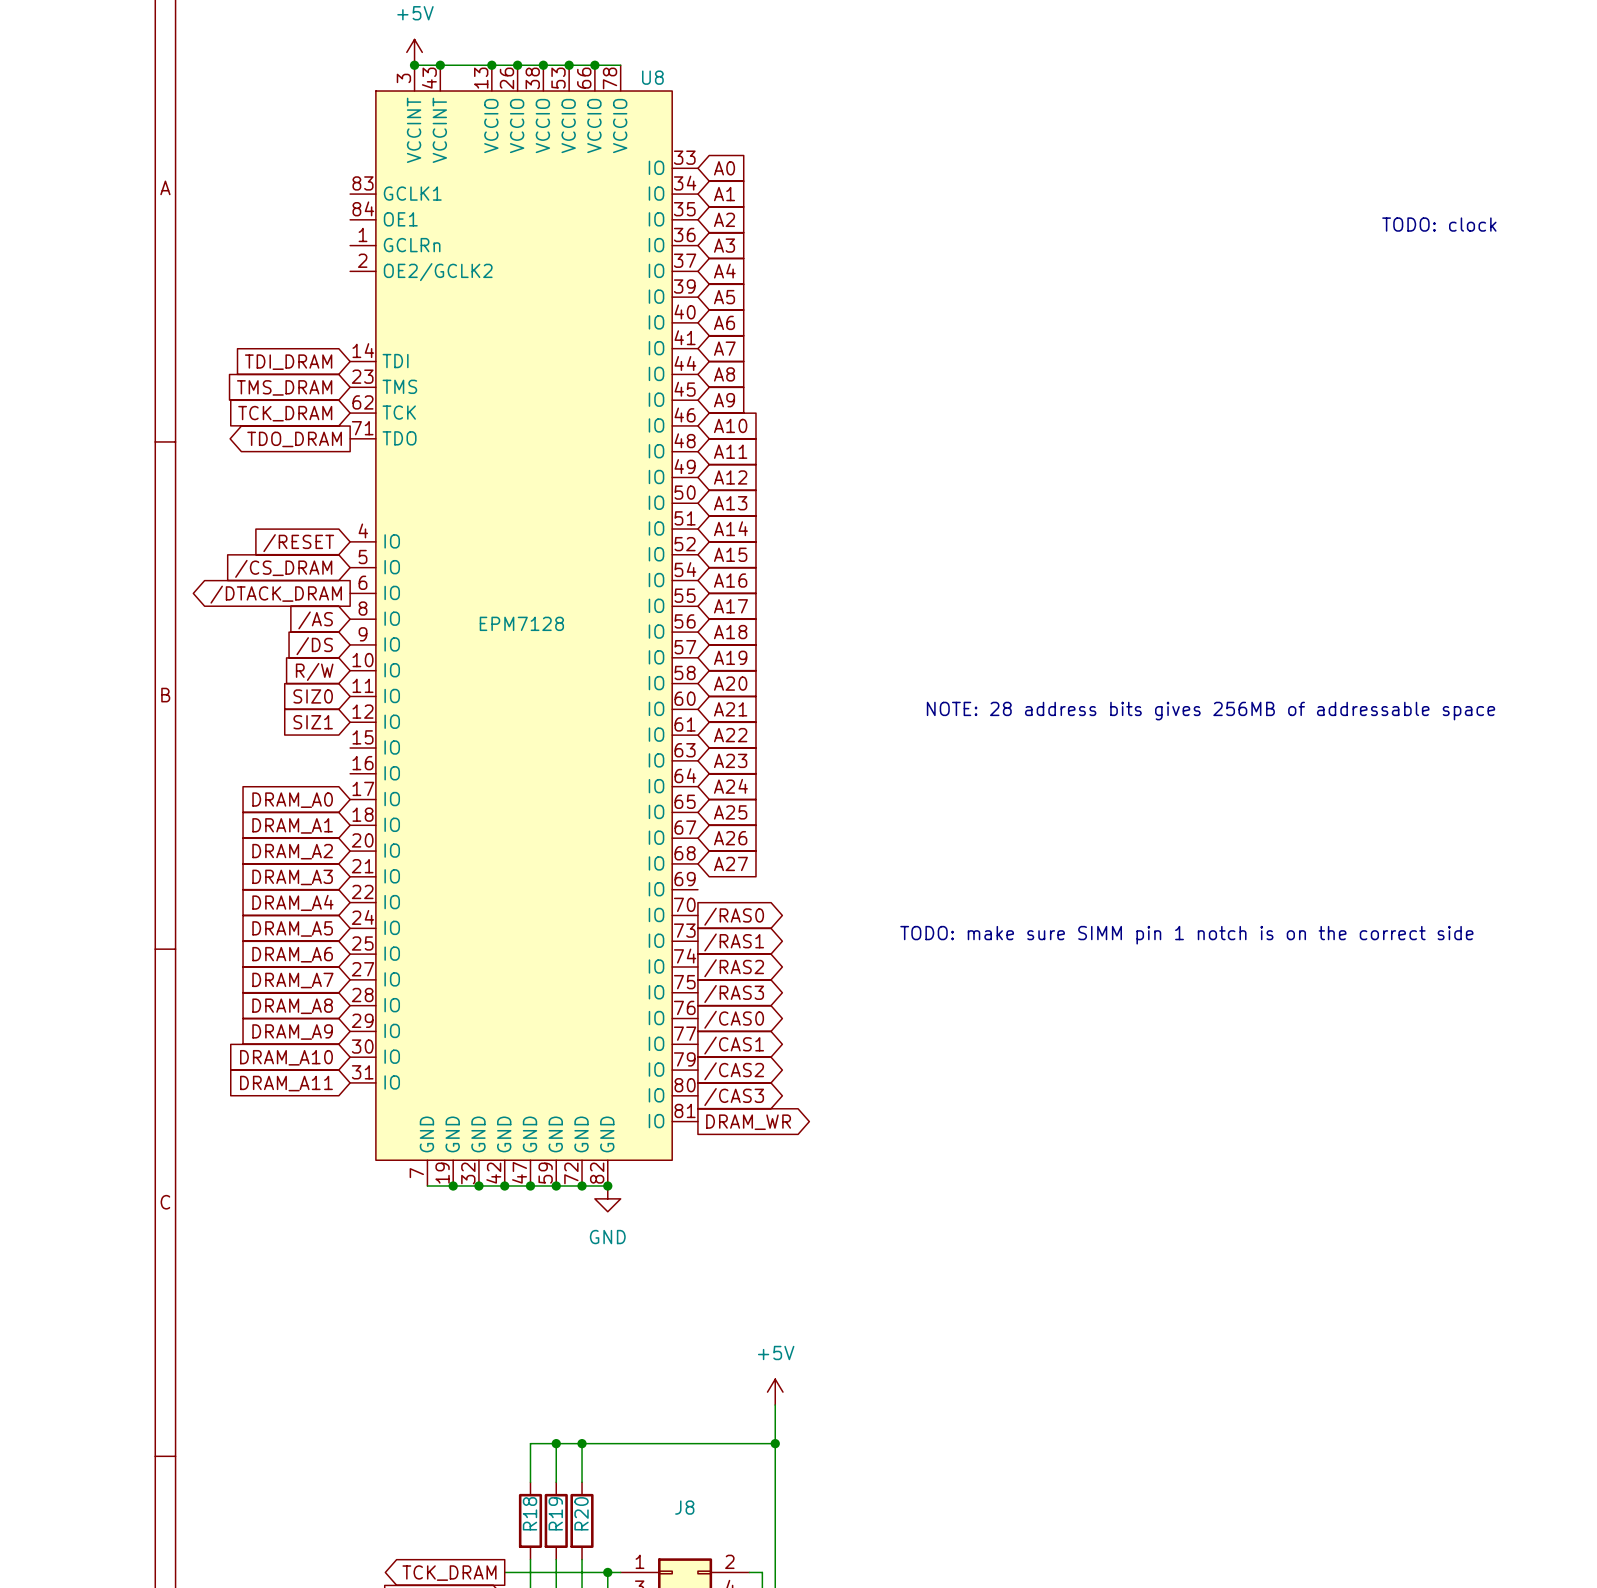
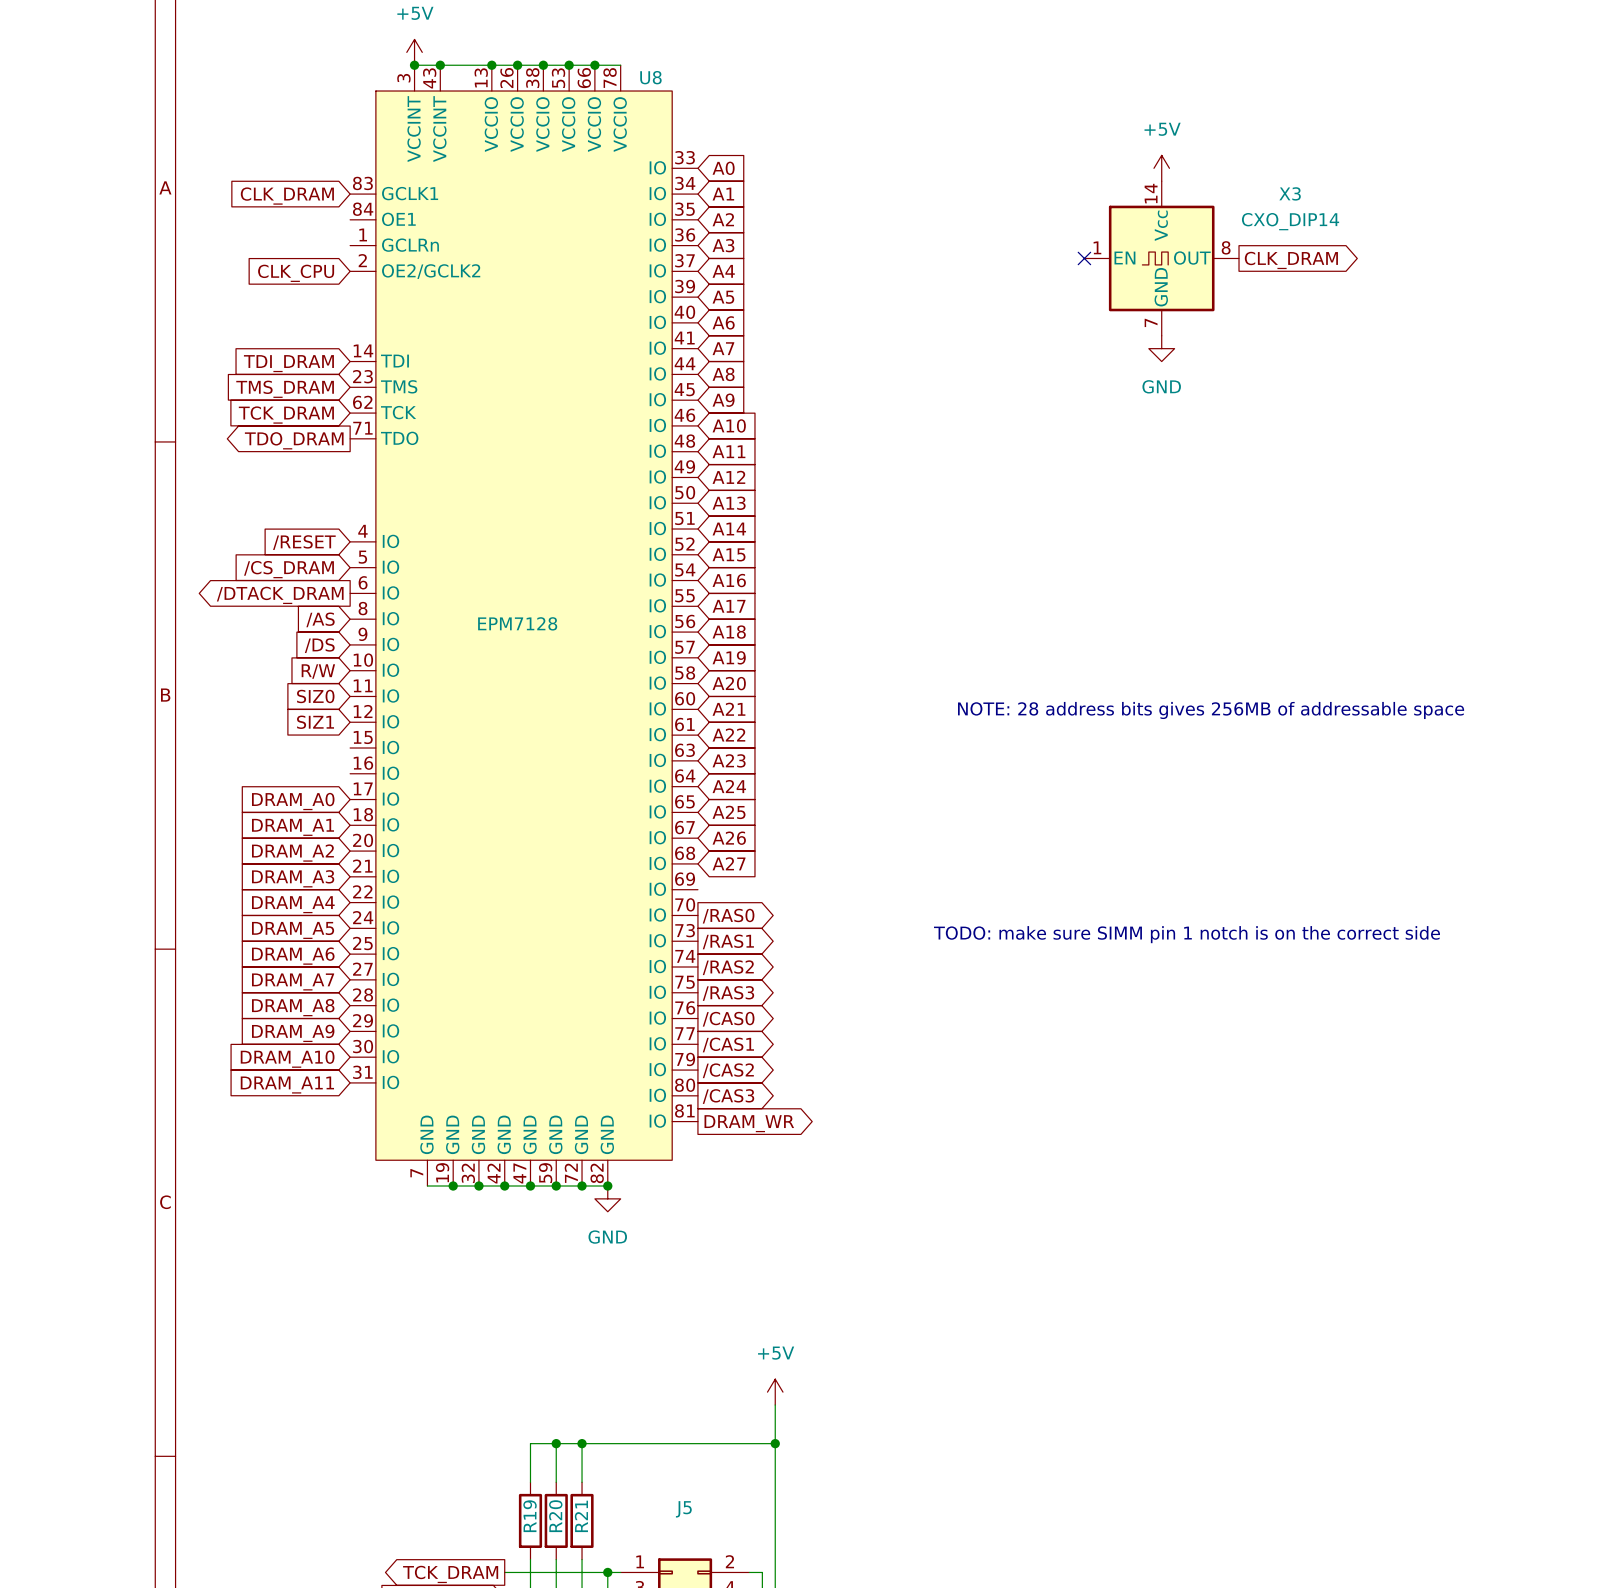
power symbol: none -> +5V (1161, 168)
global label: none -> CLK_DRAM (287, 196)
text: TODO: clock (1439, 224) -> none
no-connect mark: none -> (1084, 258)
X3: none -> CXO_DIP14 (1161, 258)
global label: none -> CLK_DRAM (1291, 260)
global label: none -> CLK_CPU (296, 273)
power symbol: none -> GND (1161, 348)
J8 name: J8 (684, 1507) -> J5 (683, 1509)
R18 name: R18 (530, 1513) -> R19 (530, 1516)
R19 name: R19 (555, 1513) -> R20 (555, 1516)
R20 name: R20 (581, 1513) -> R21 (581, 1516)

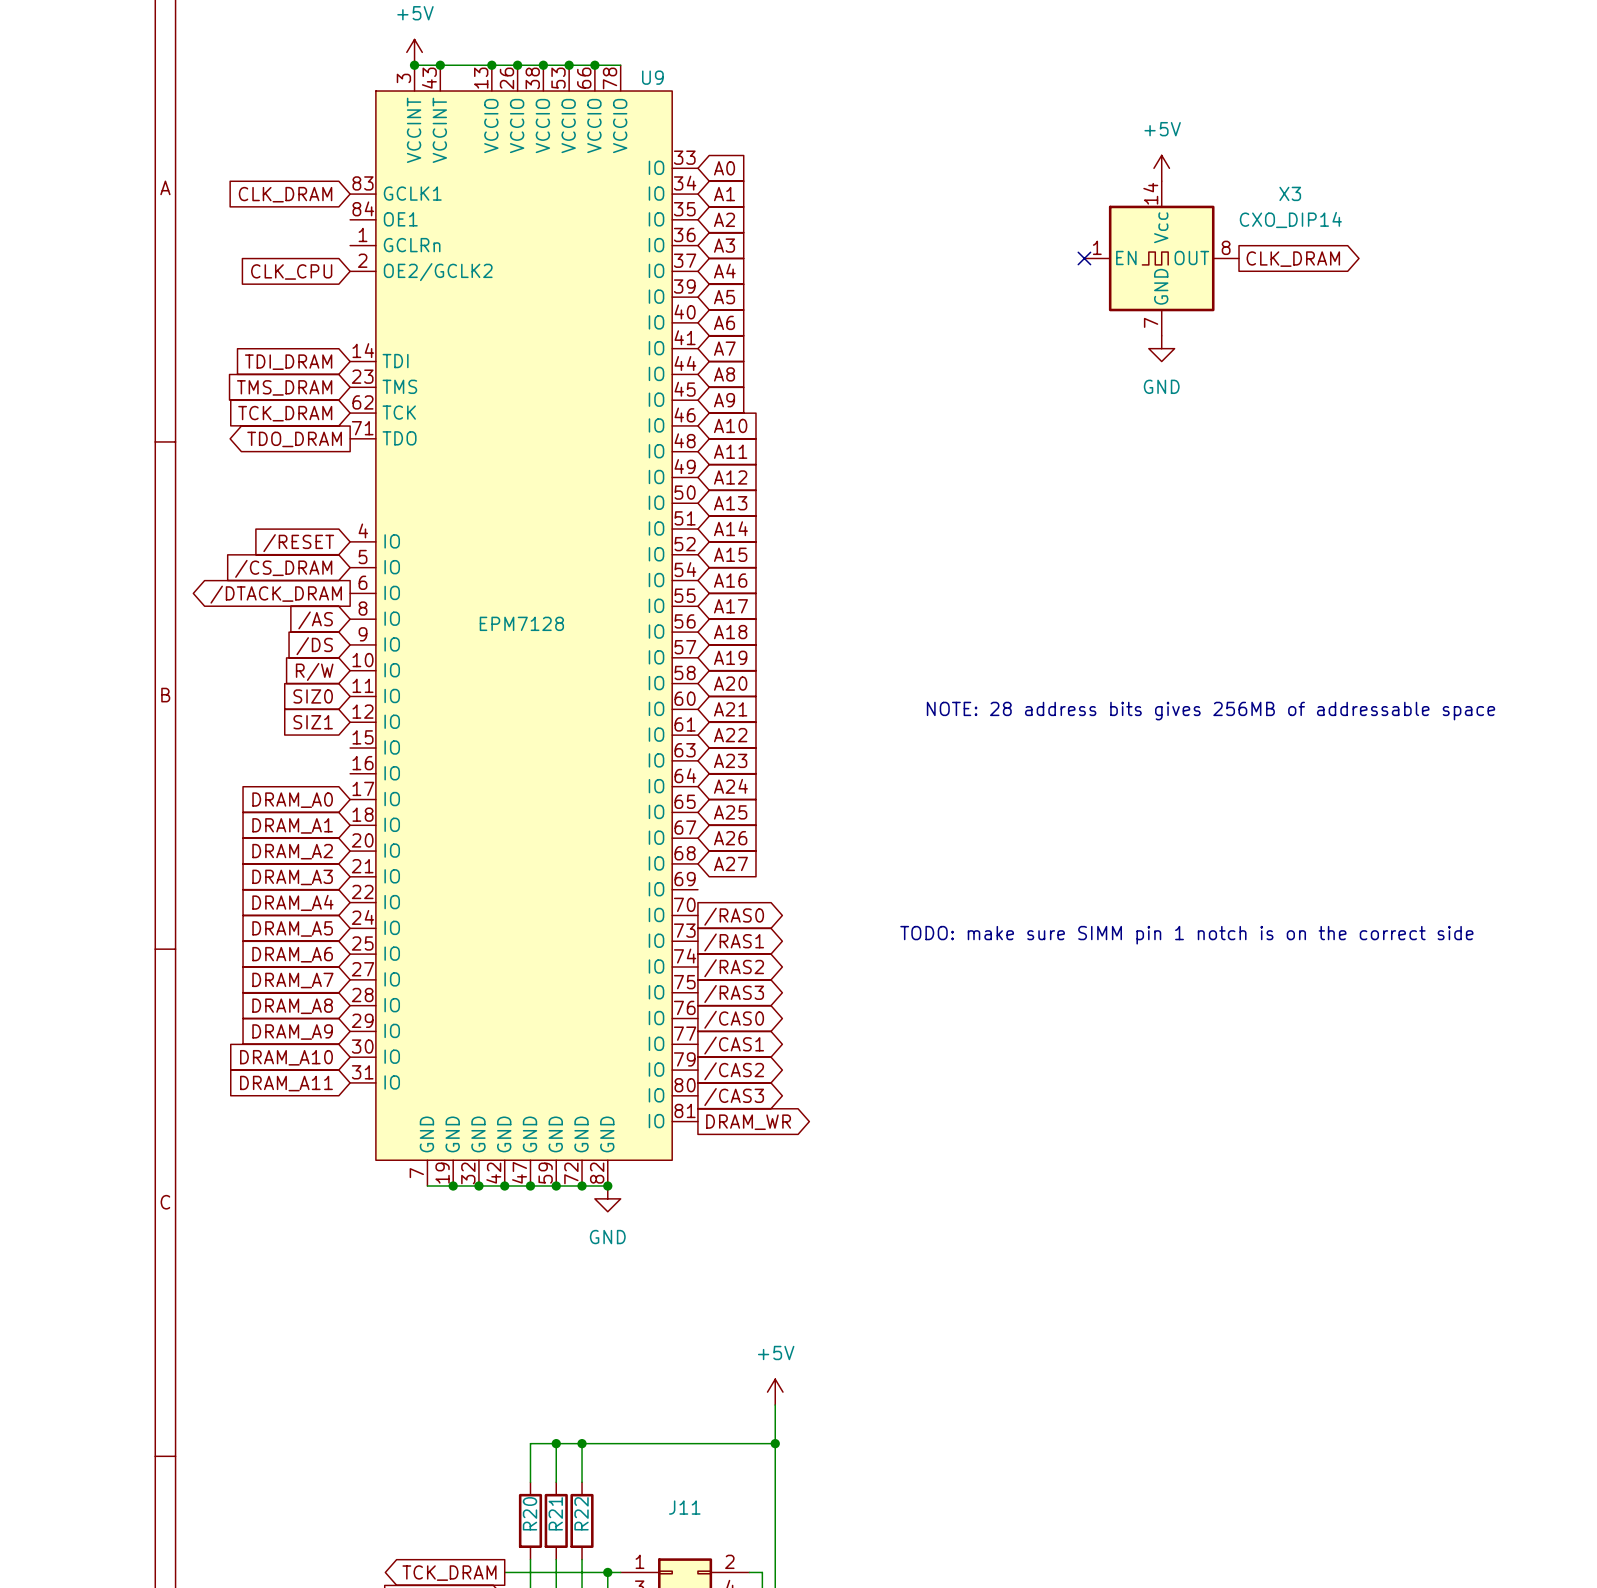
U8 name: U8 (650, 77) -> U9 (652, 77)
J5 name: J5 (683, 1509) -> J11 (684, 1507)
R19 name: R19 (530, 1516) -> R20 (530, 1513)
R20 name: R20 (555, 1516) -> R21 (555, 1513)
R21 name: R21 (581, 1516) -> R22 (581, 1513)

